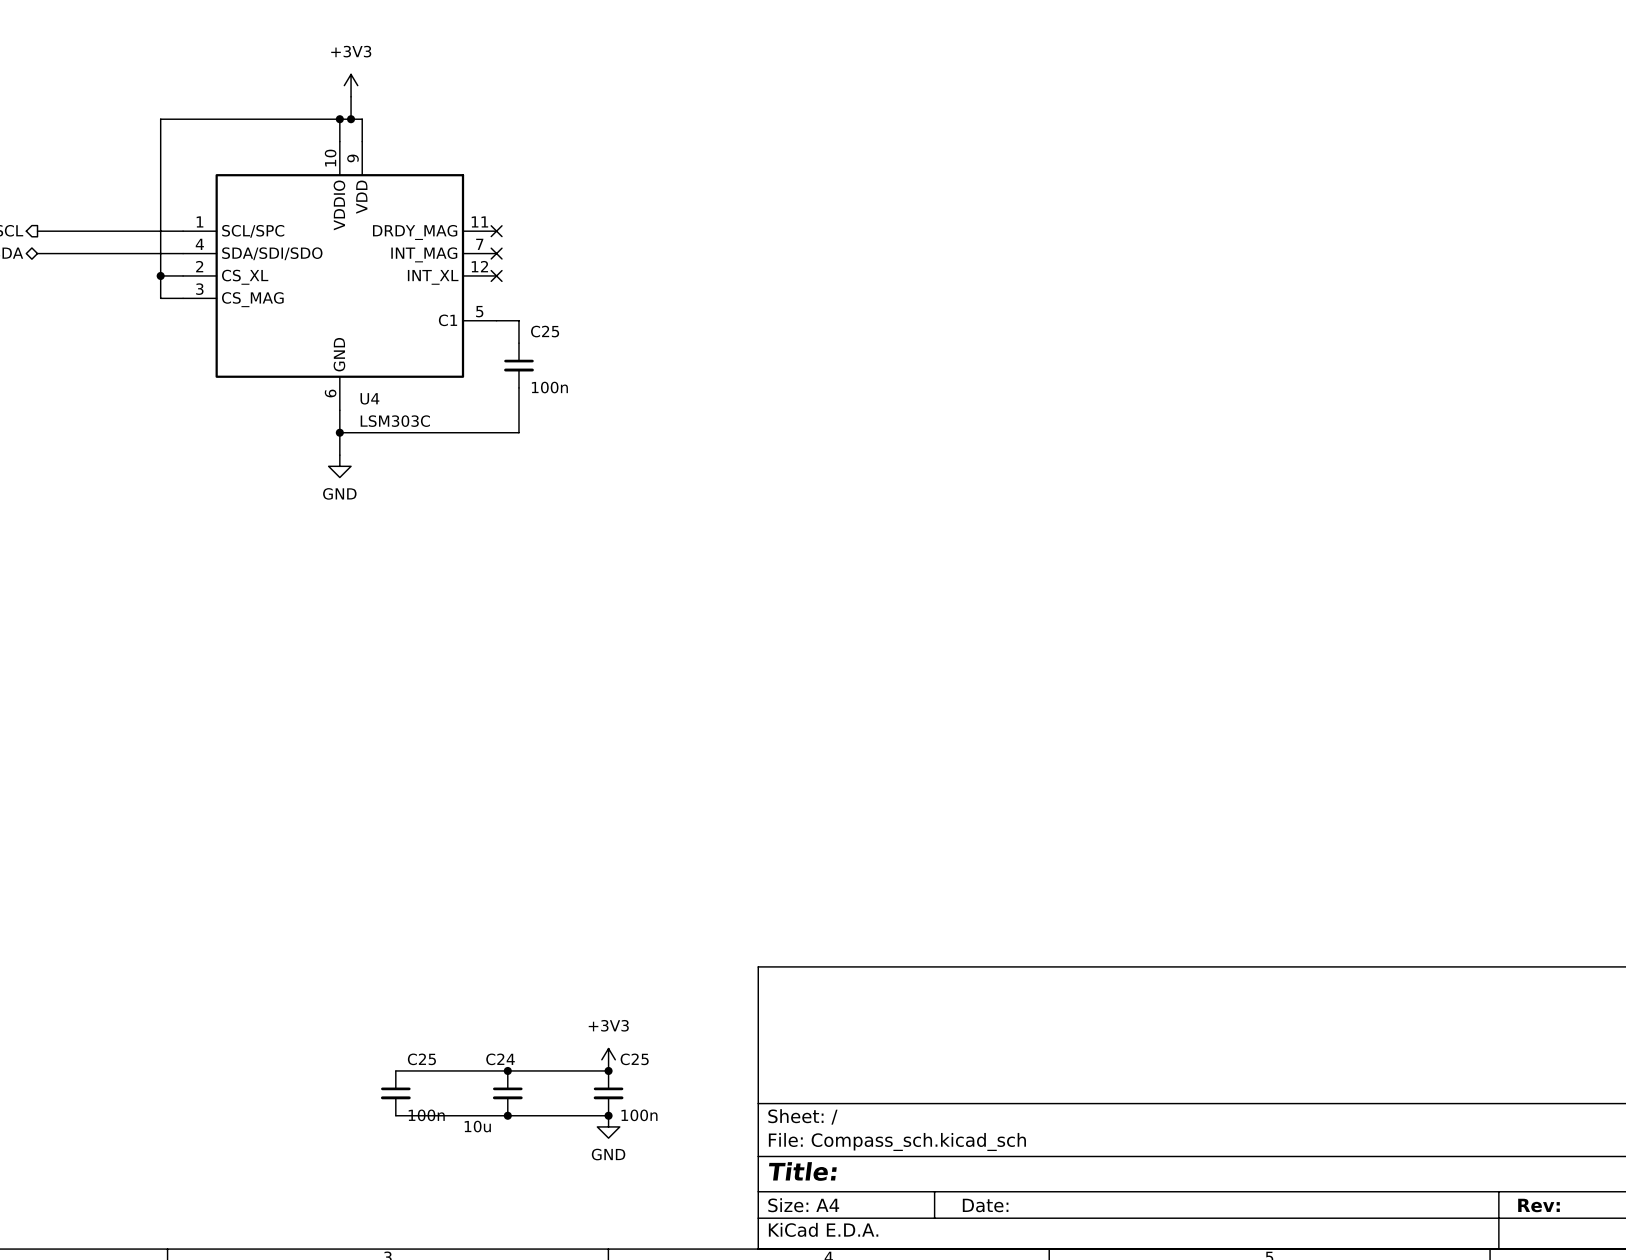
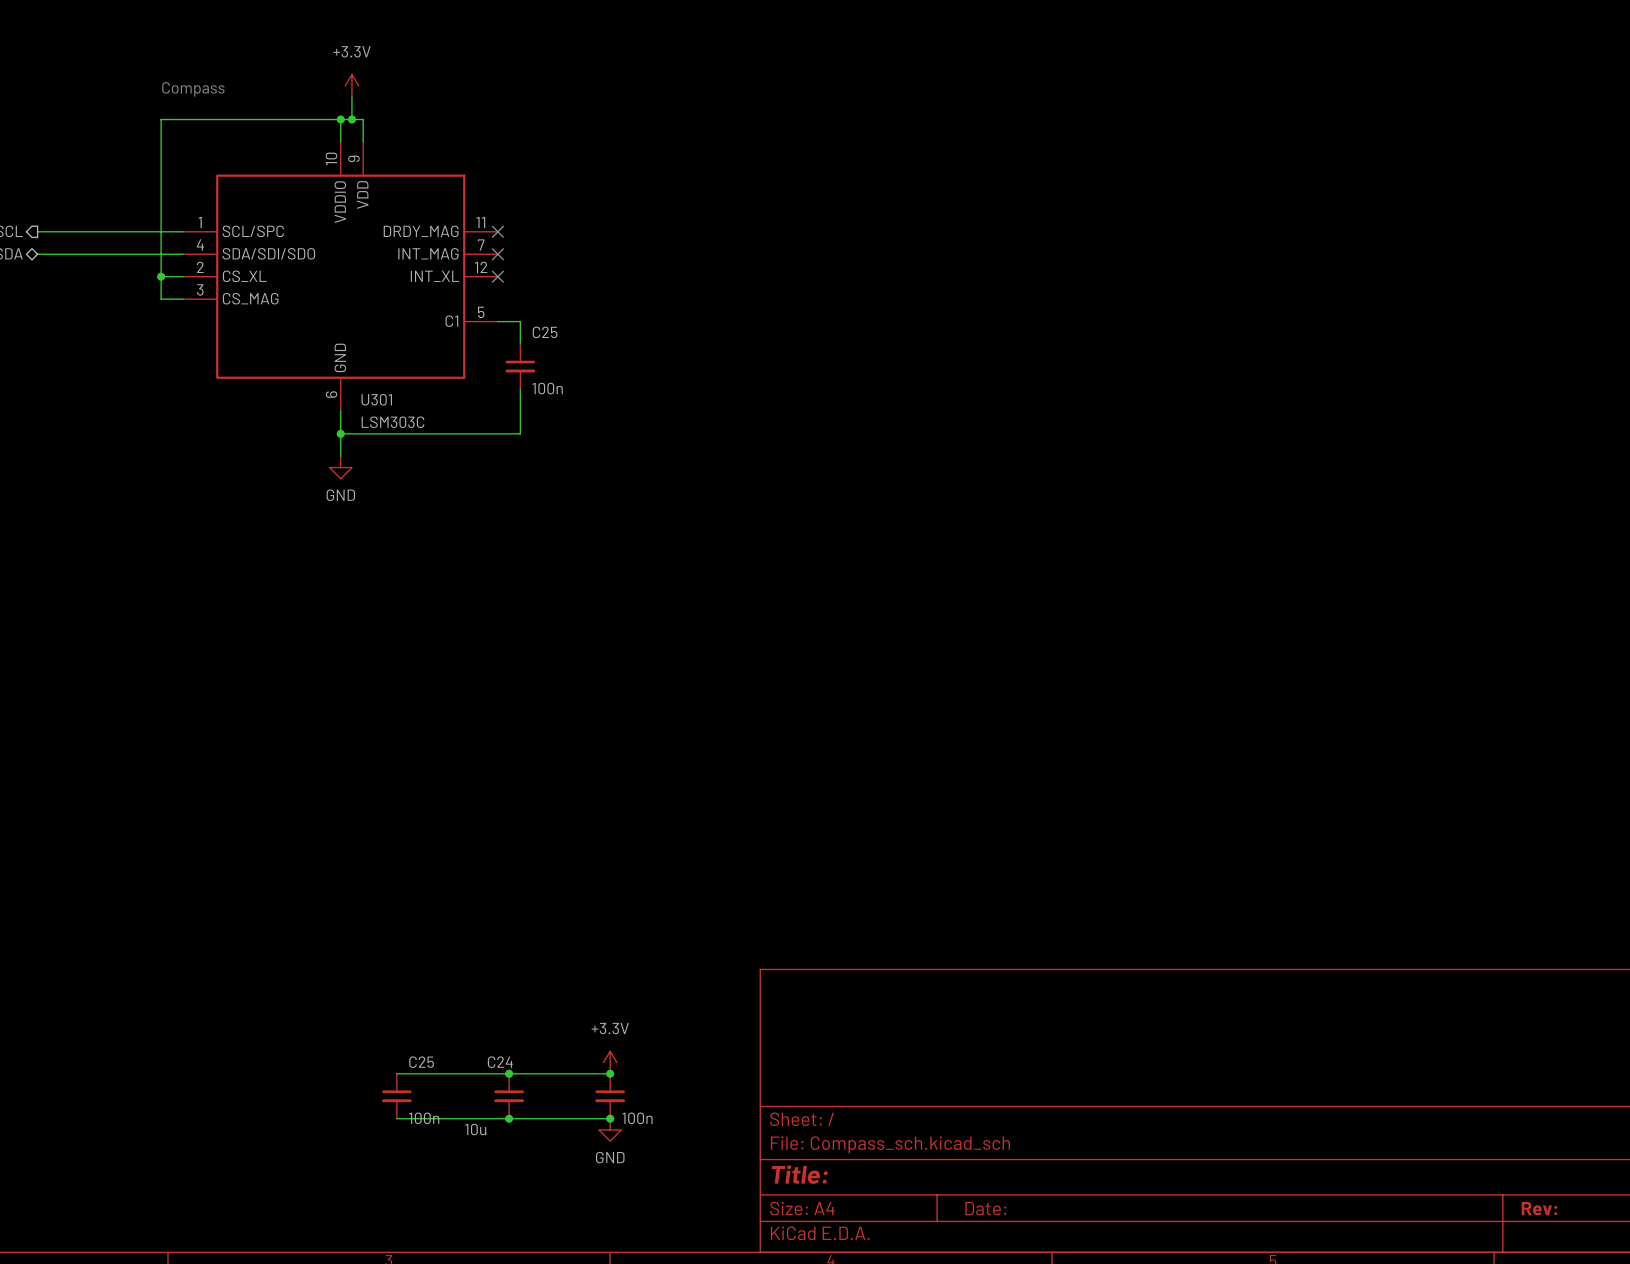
power symbol: +3V3 (351, 85) -> +3.3V (351, 85)
text: none -> Compass (193, 89)
U4 name: U4 (369, 398) -> U301 (376, 399)
power symbol: +3V3 (608, 1059) -> +3.3V (610, 1062)
C25 name: C25 (634, 1059) -> none

